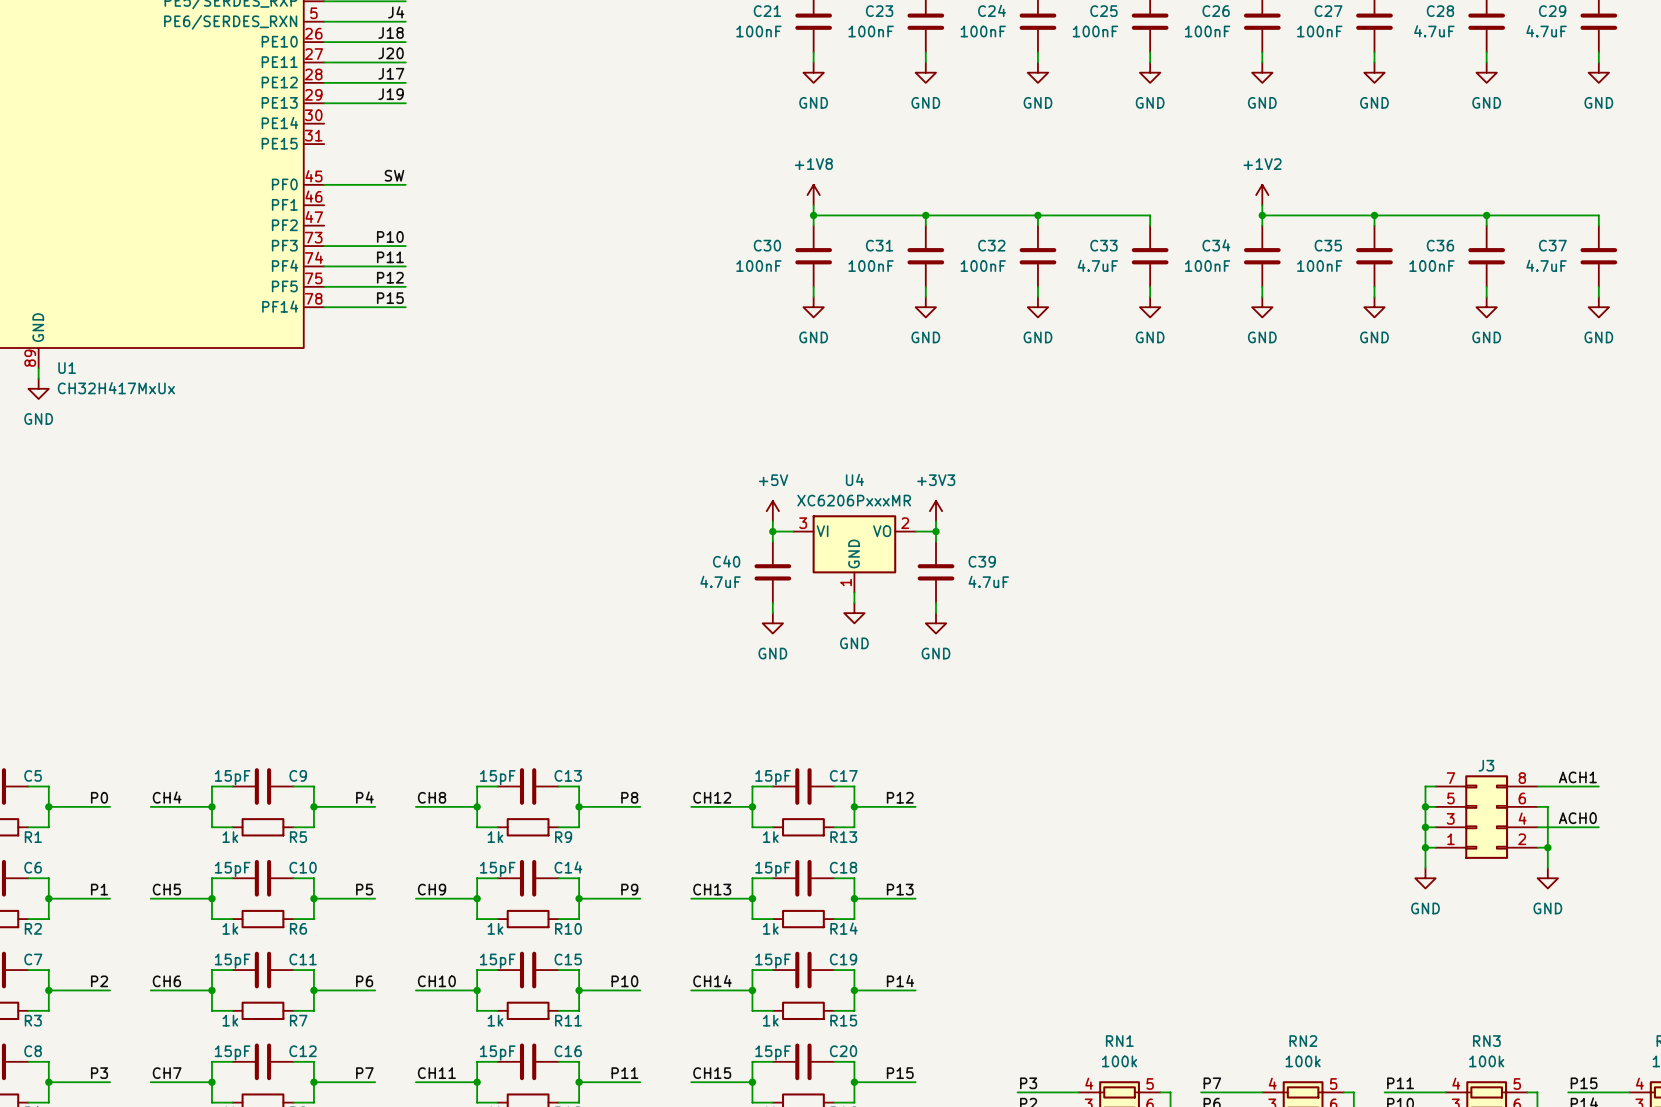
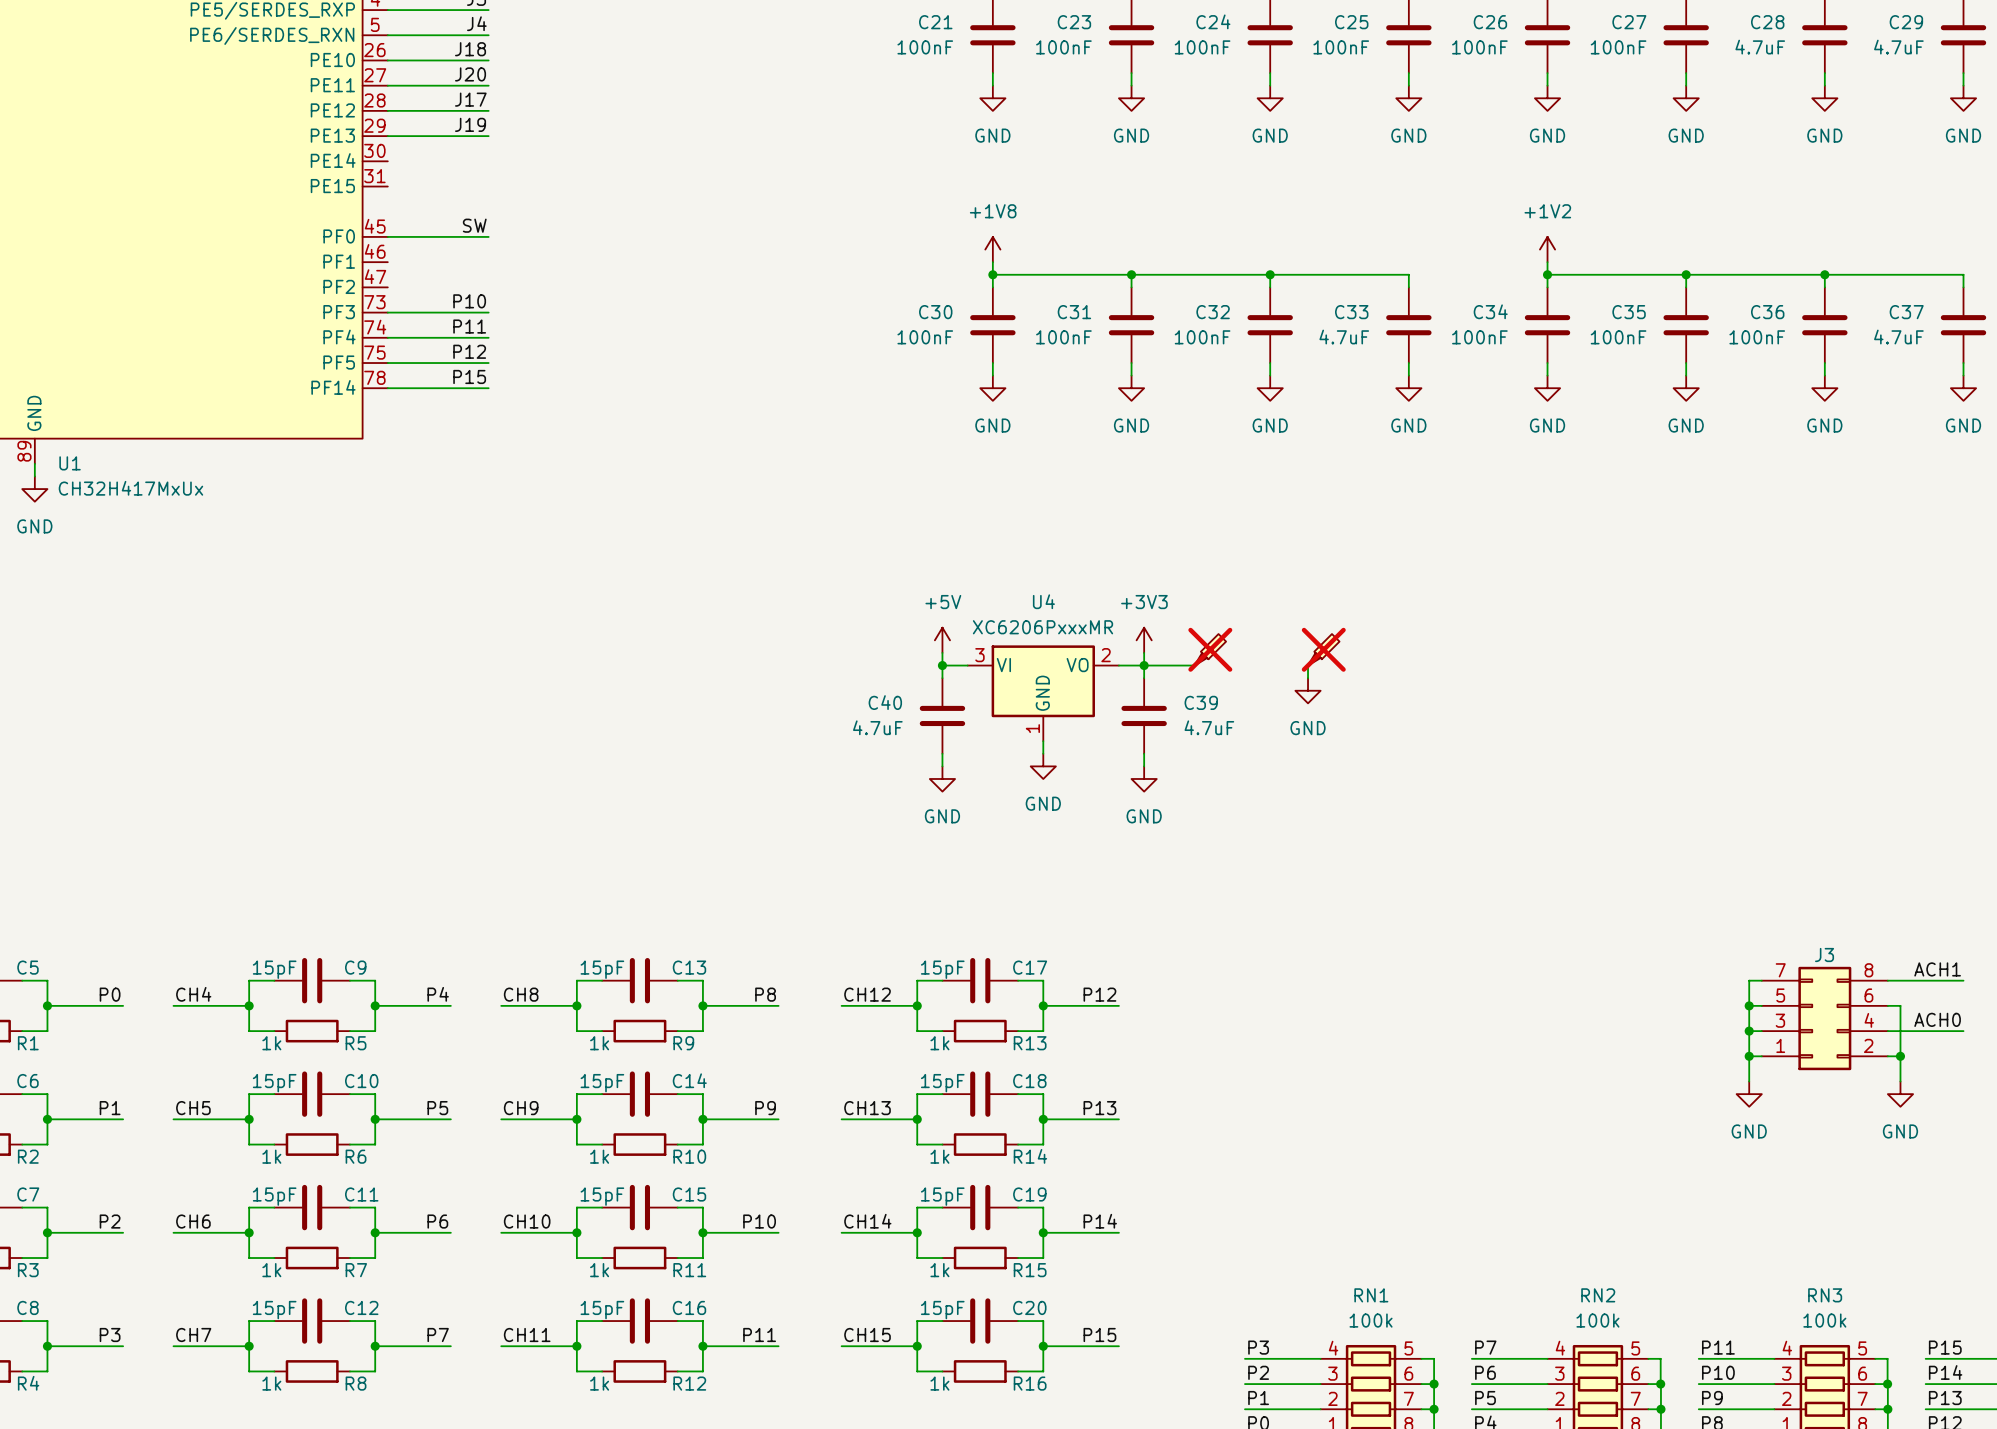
part: none -> (1210, 649)
part: none -> (1323, 649)
wire: none -> (1144, 665) (1194, 665)
wire: none -> (1308, 665) (1308, 678)
power symbol: none -> GND (1308, 690)

